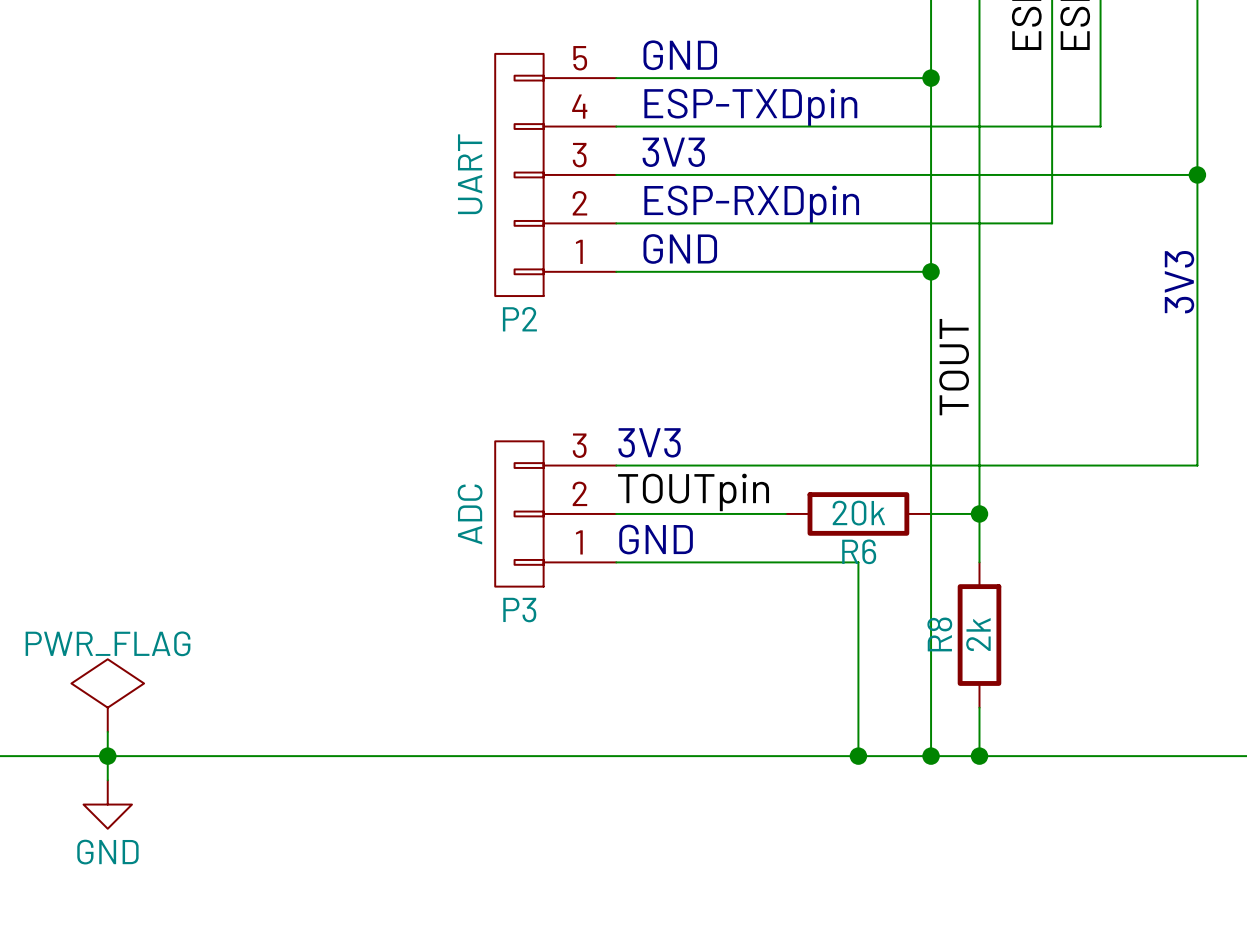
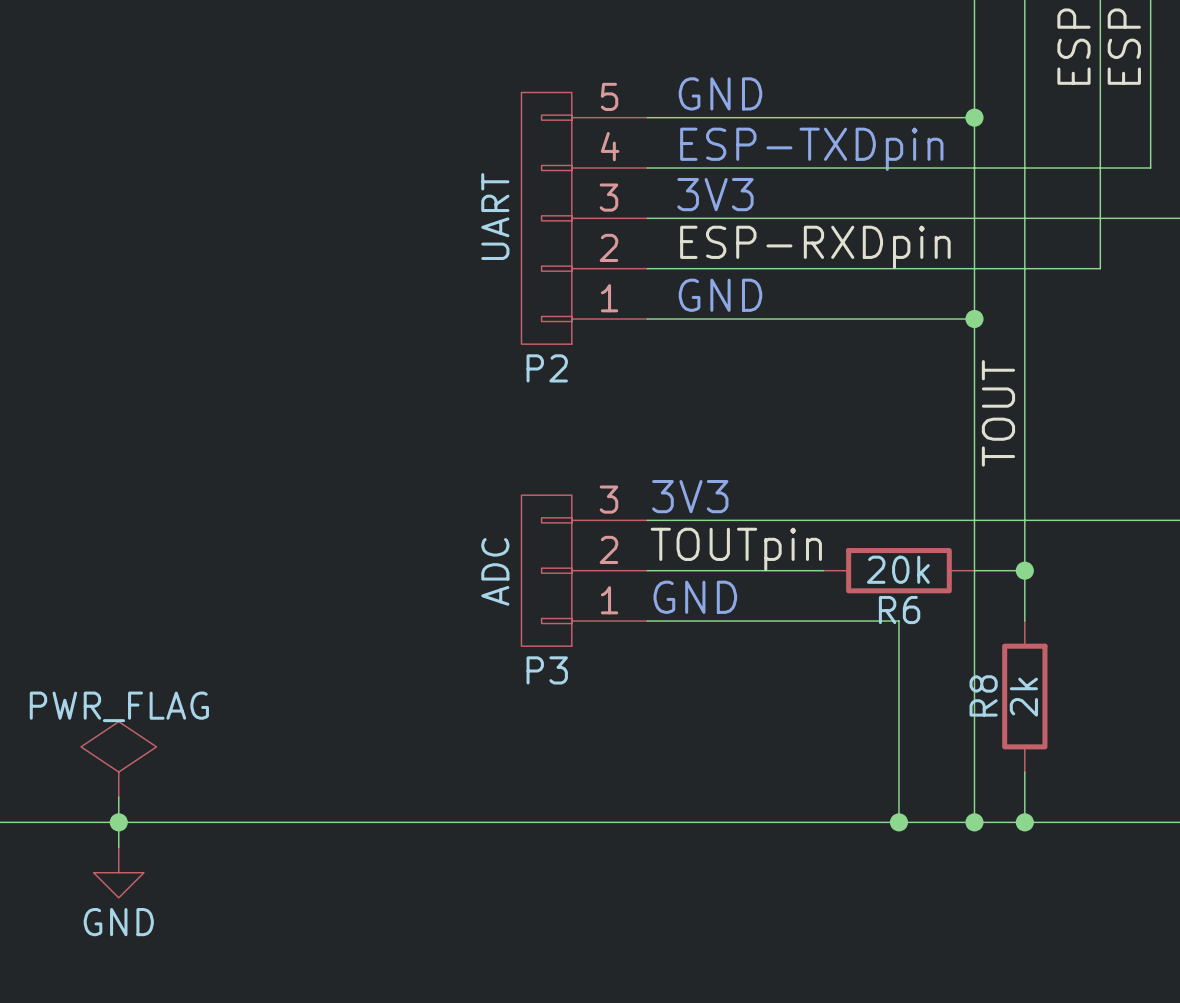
label: none -> ESP-RXDpin (815, 247)
text: ESP-RXDpin (751, 204) -> none

